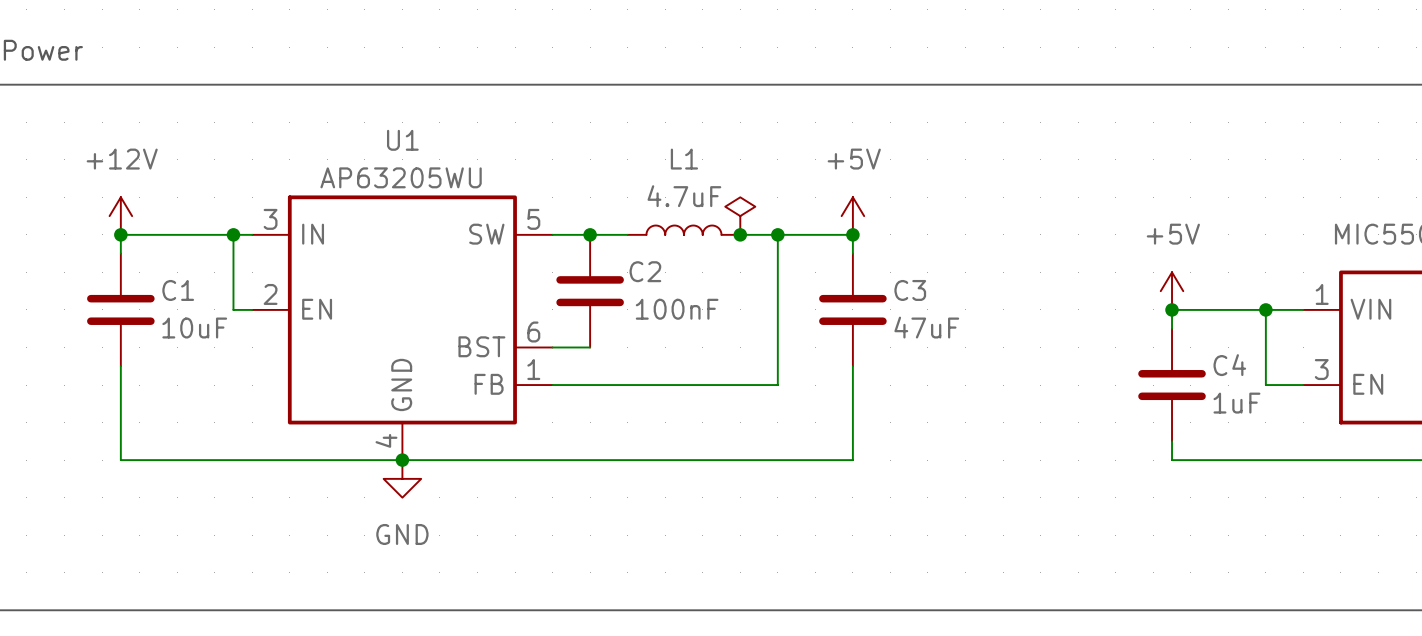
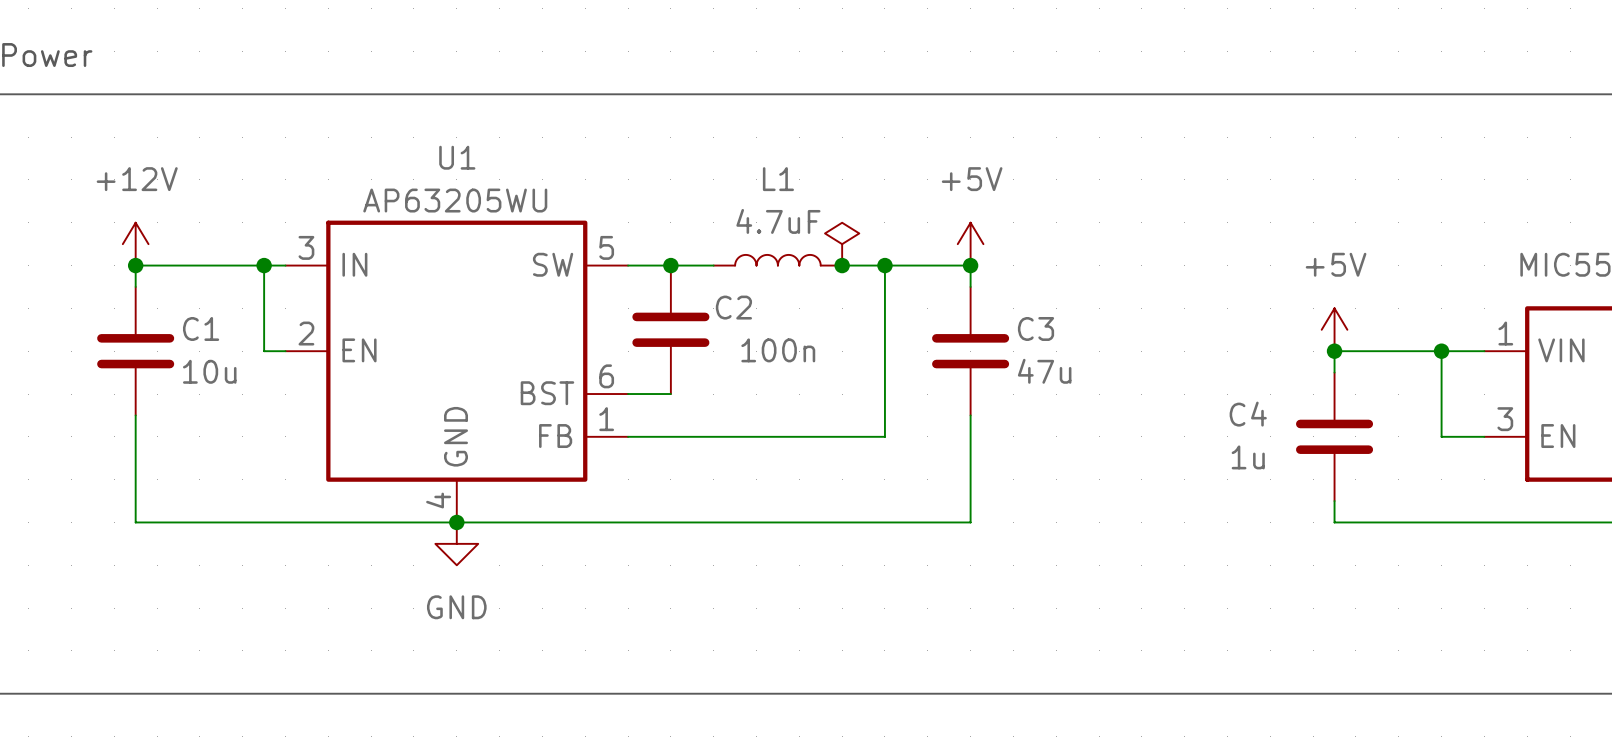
C2 value: 100nF (677, 309) -> 100n (778, 350)
C3 value: 47uF (926, 327) -> 47u (1044, 371)
C1 value: 10uF (194, 328) -> 10u (209, 371)
C4 name position: C4 (1229, 365) -> C4 (1248, 414)
C4 value: 1uF (1236, 403) -> 1u (1248, 457)

